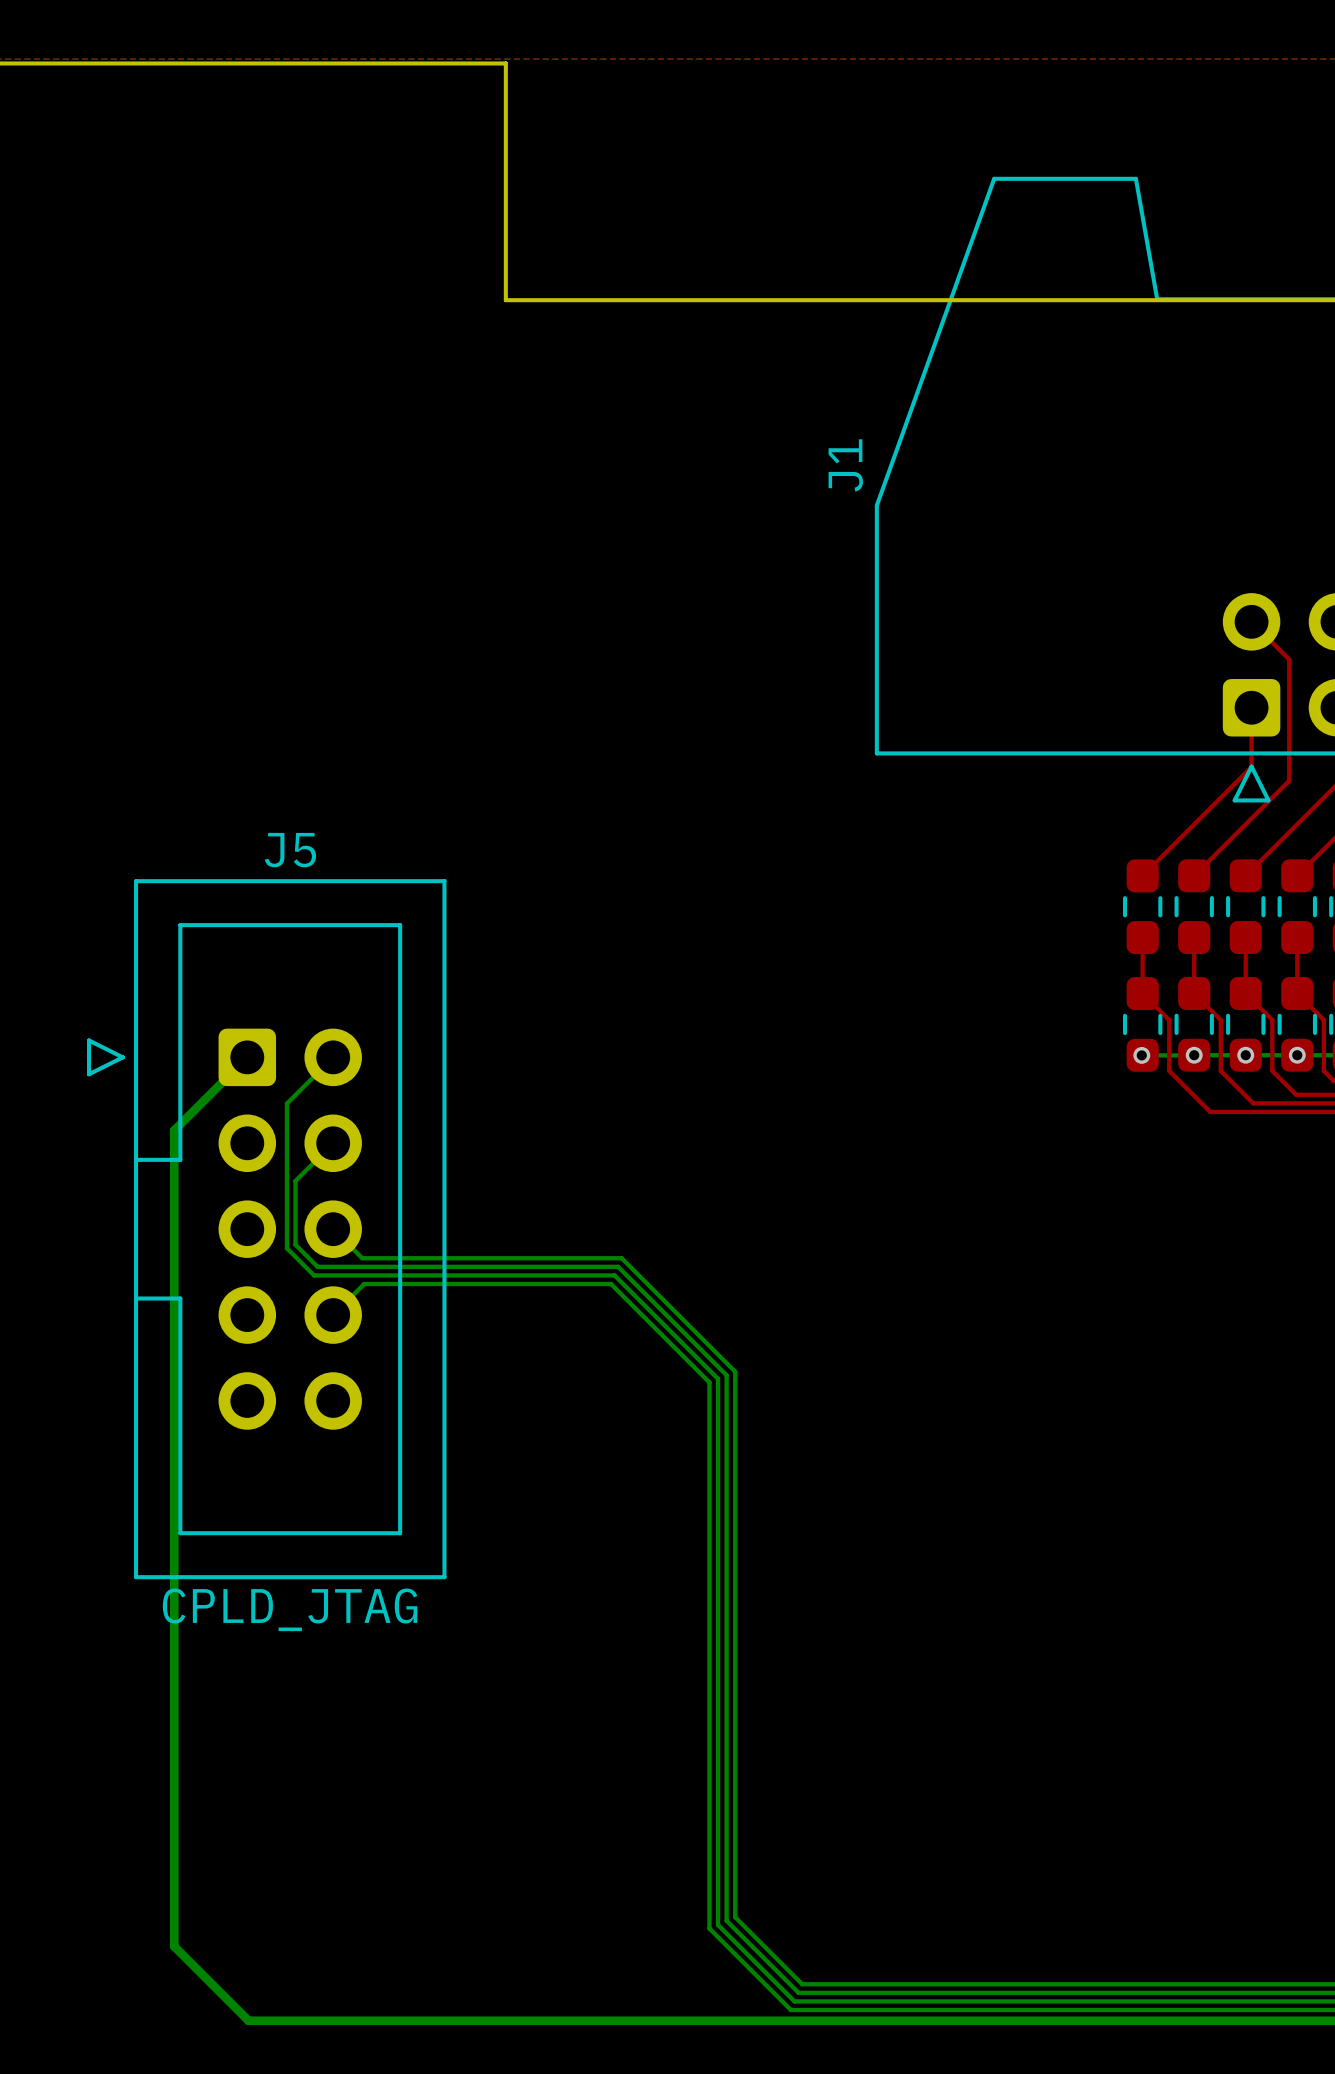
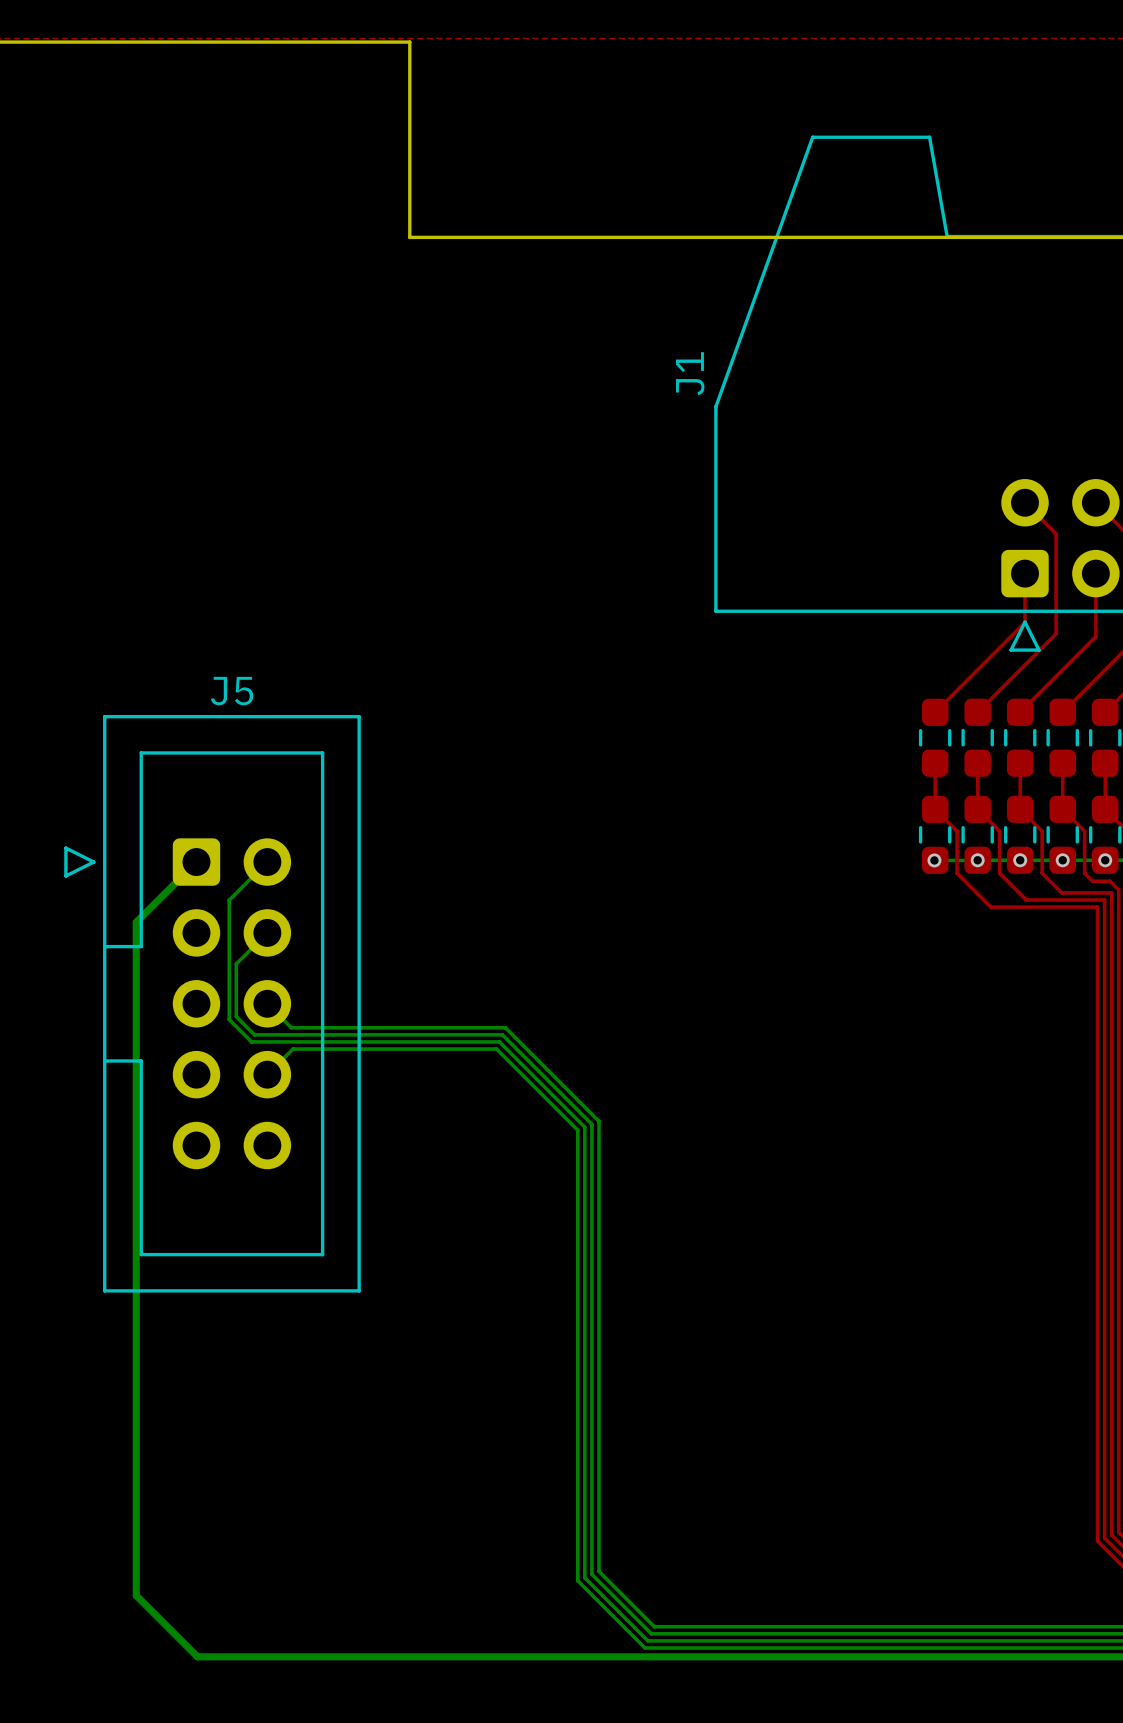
J5 value: CPLD_JTAG (290, 1609) -> none

